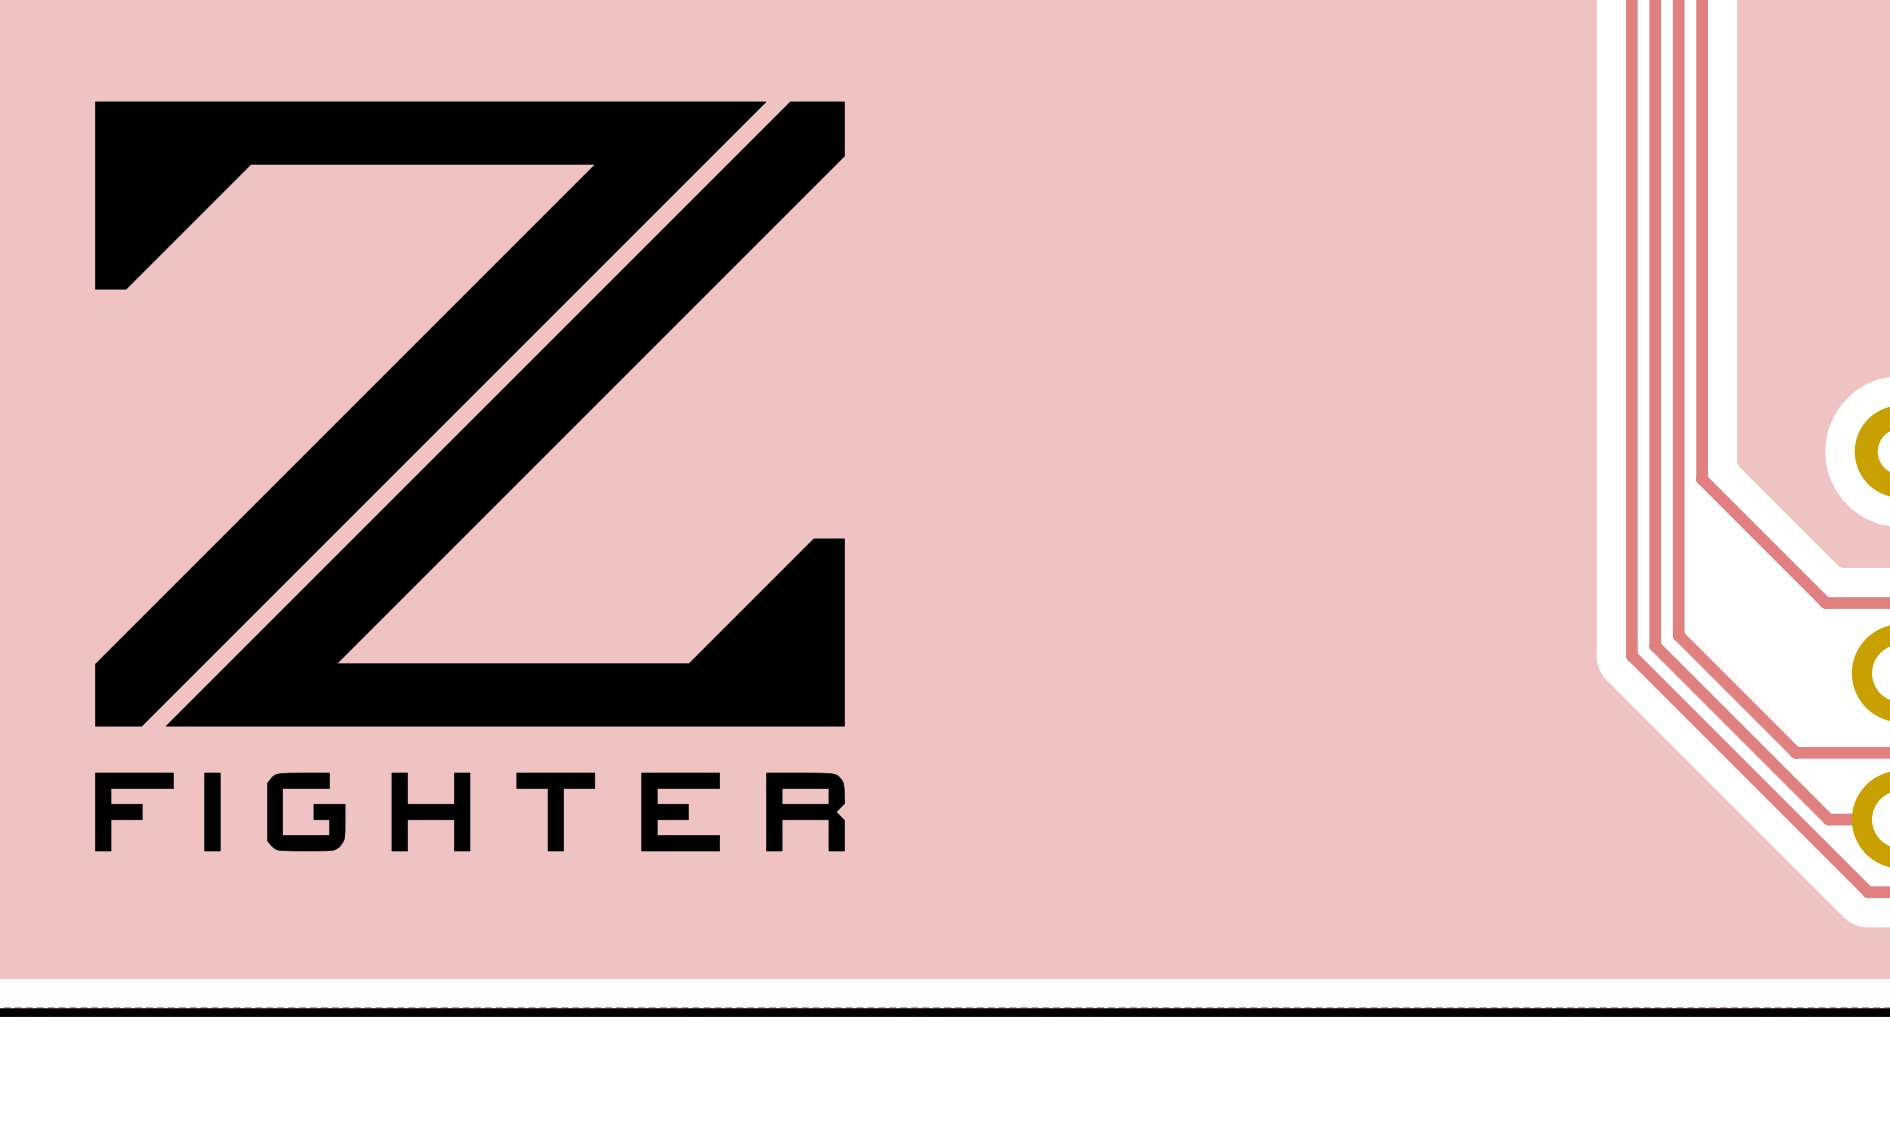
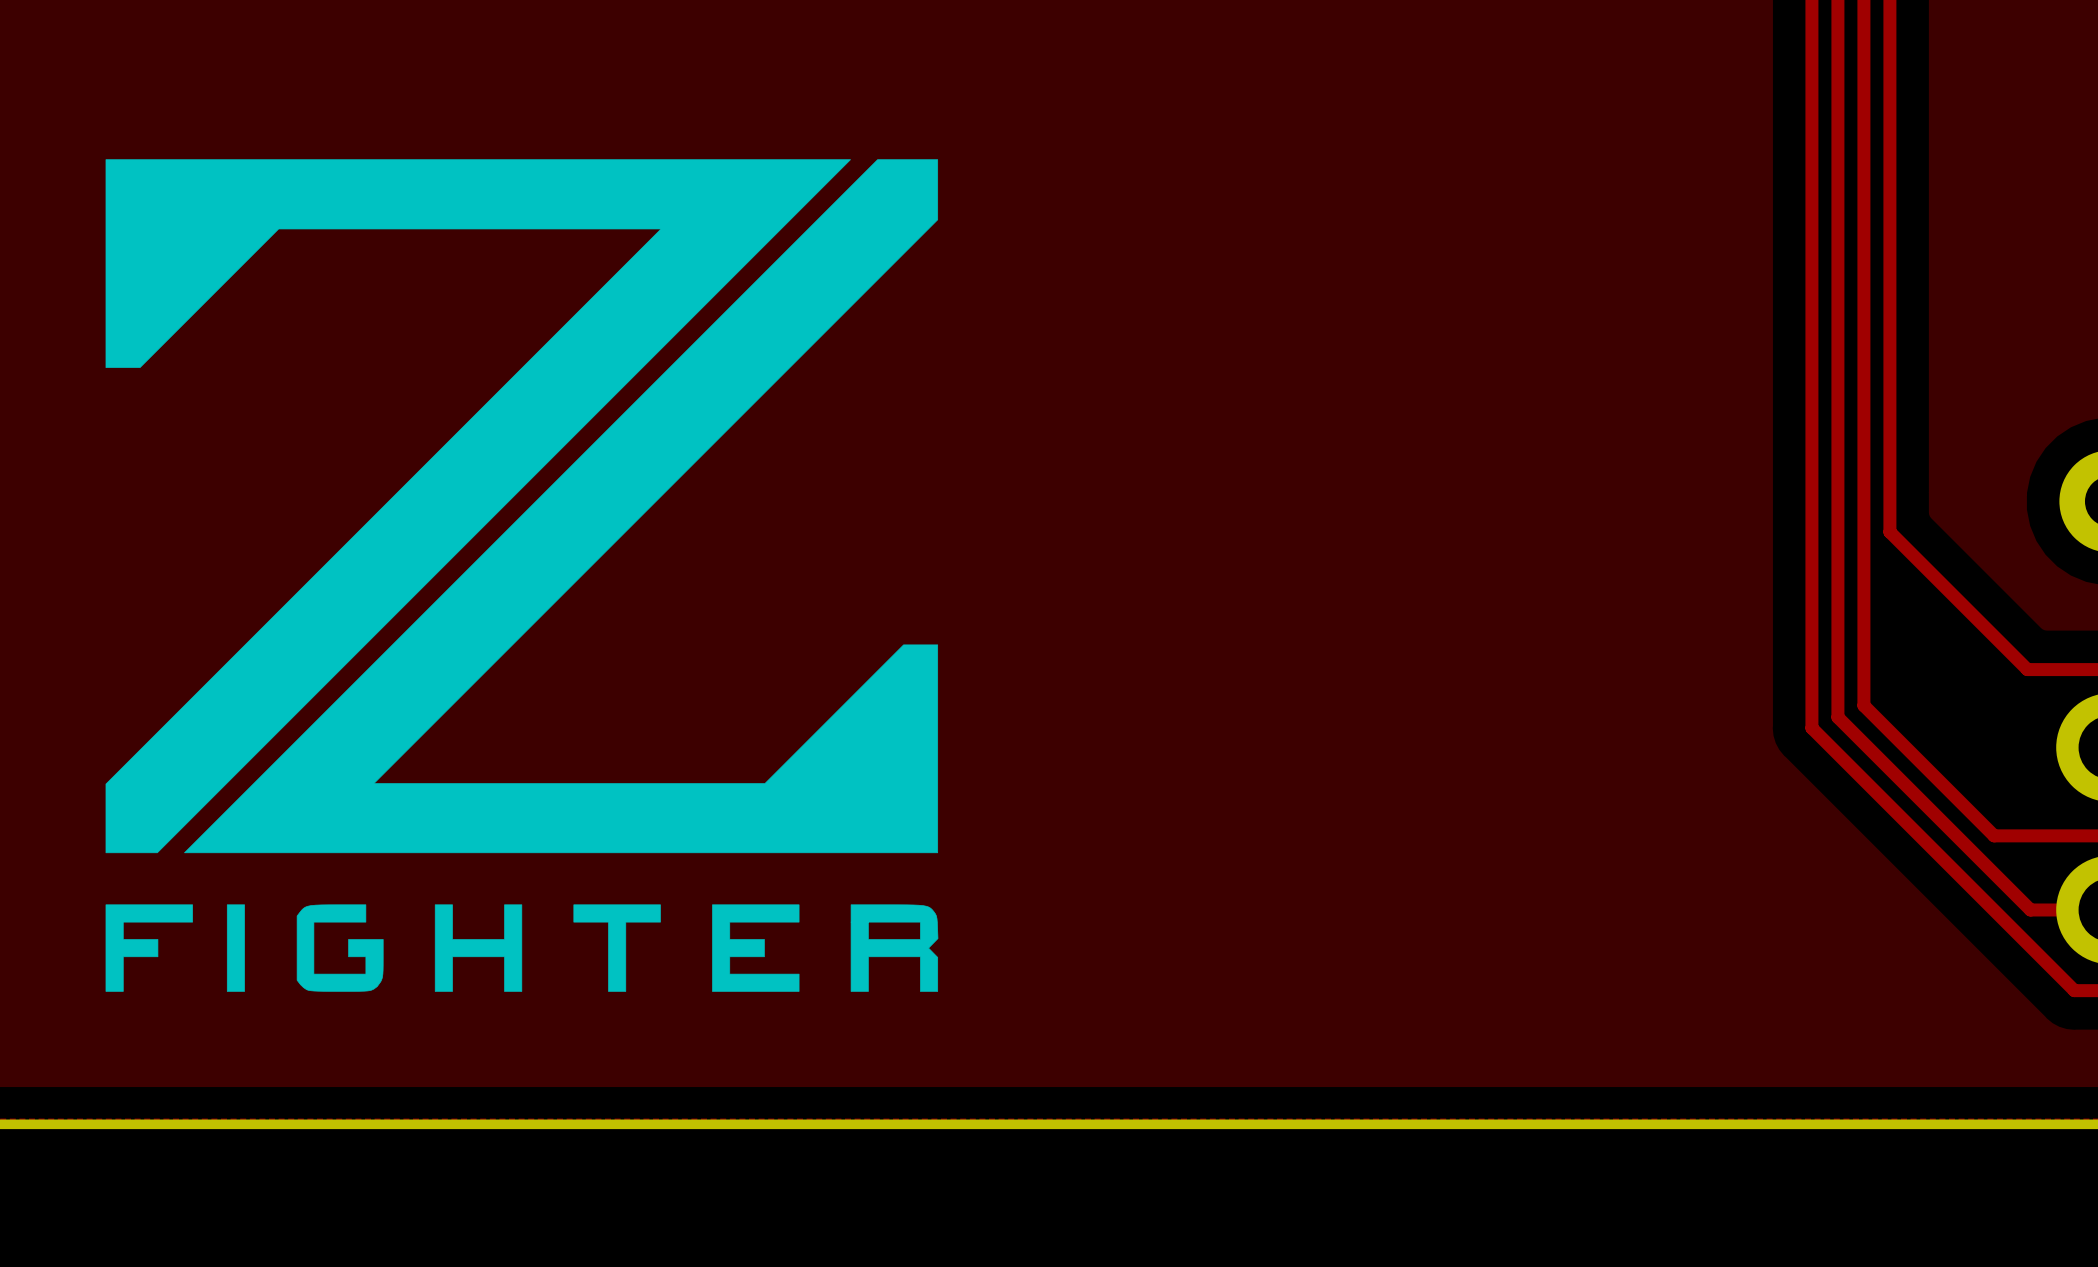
drawing position: (470, 476) -> (521, 575)

